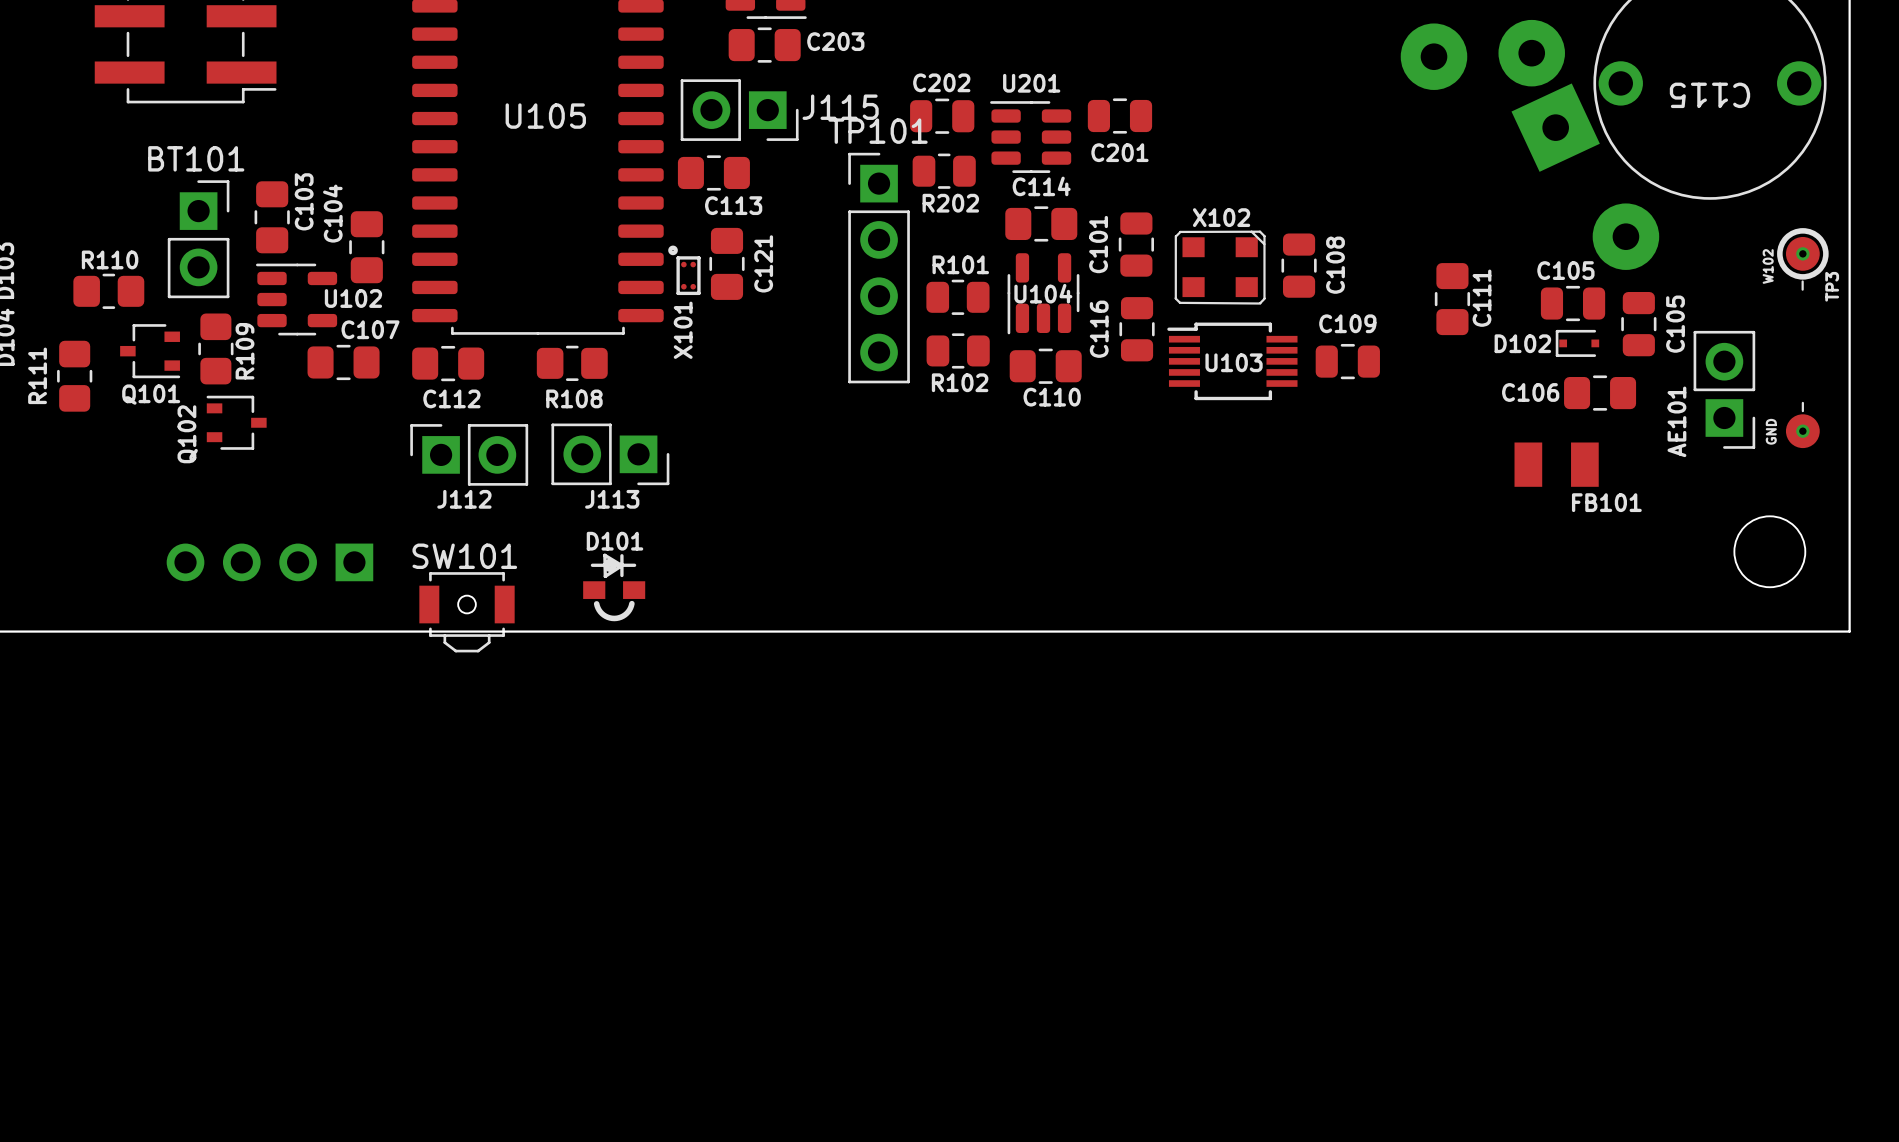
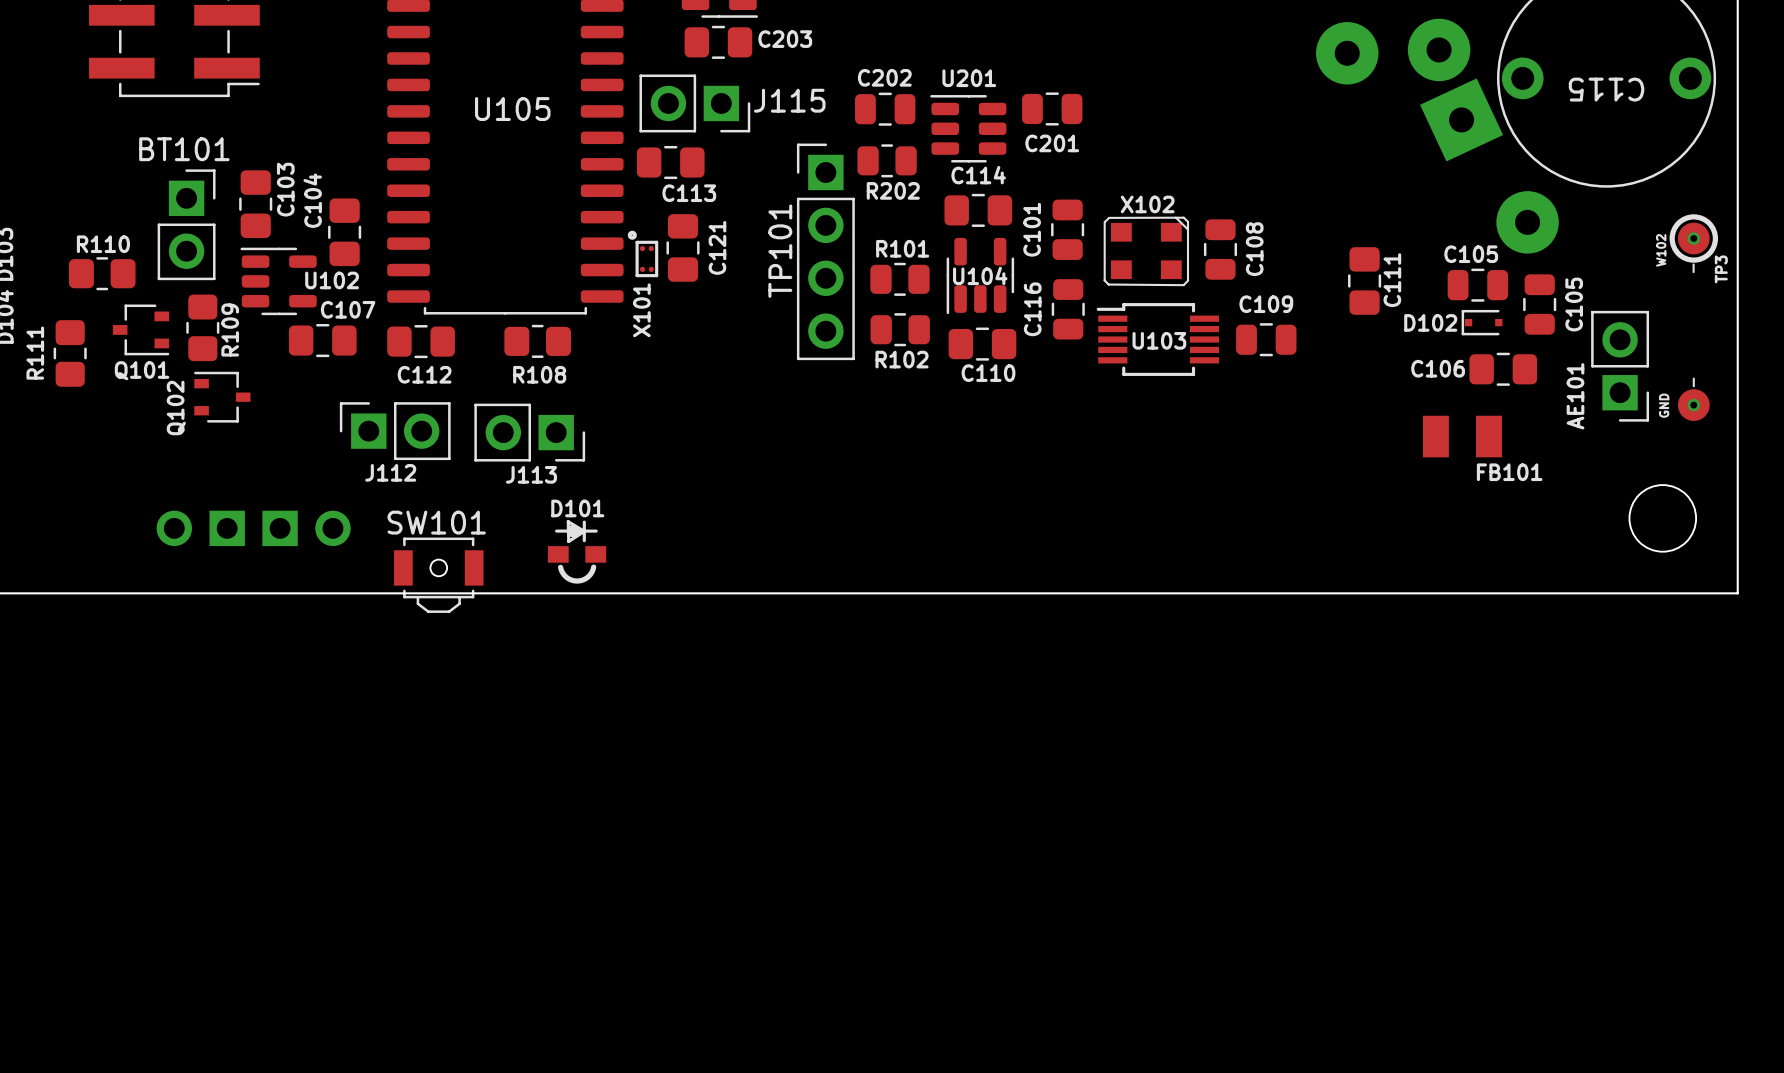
TP101 name rotation: 0° (877, 131) -> 90° counterclockwise (780, 251)
TP101 name position: TP101 (877, 131) -> TP101 (780, 251)
J112 position: (469, 454) -> (395, 431)
J113 position: (610, 454) -> (529, 432)
part footprint: [166, 543, 374, 582] -> [156, 510, 351, 547]

